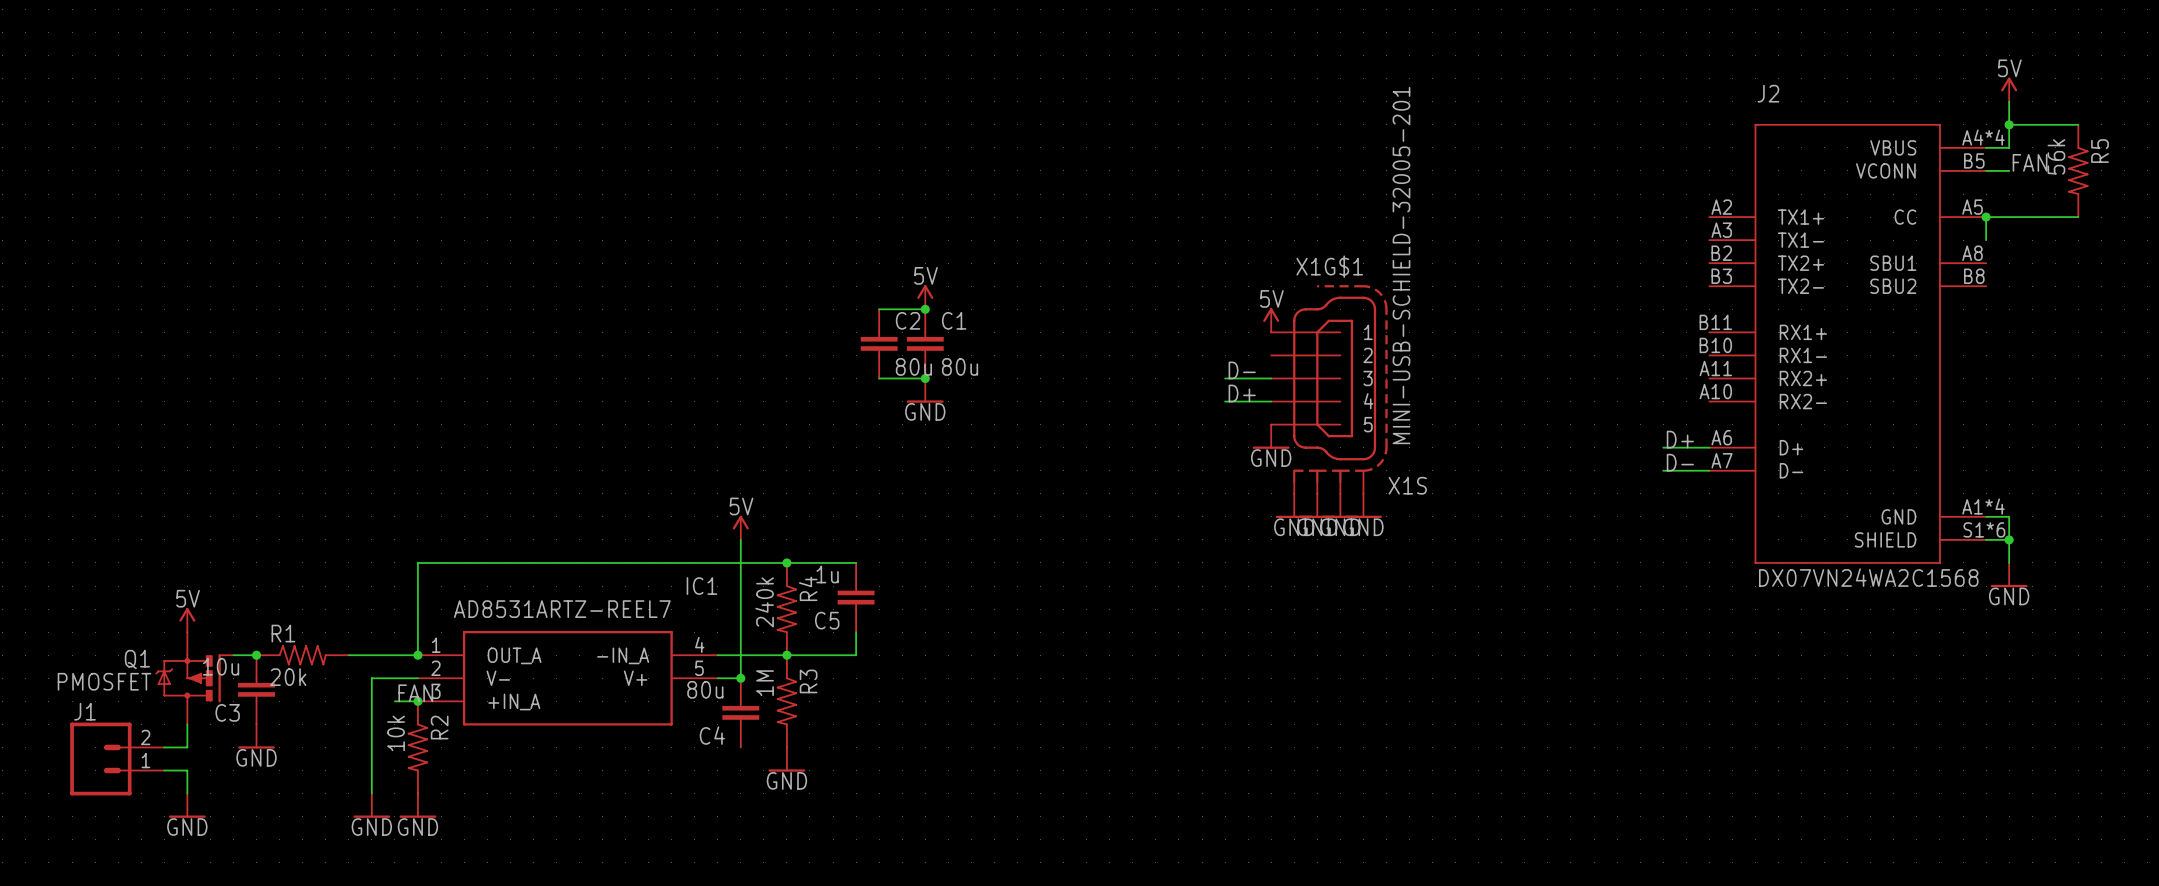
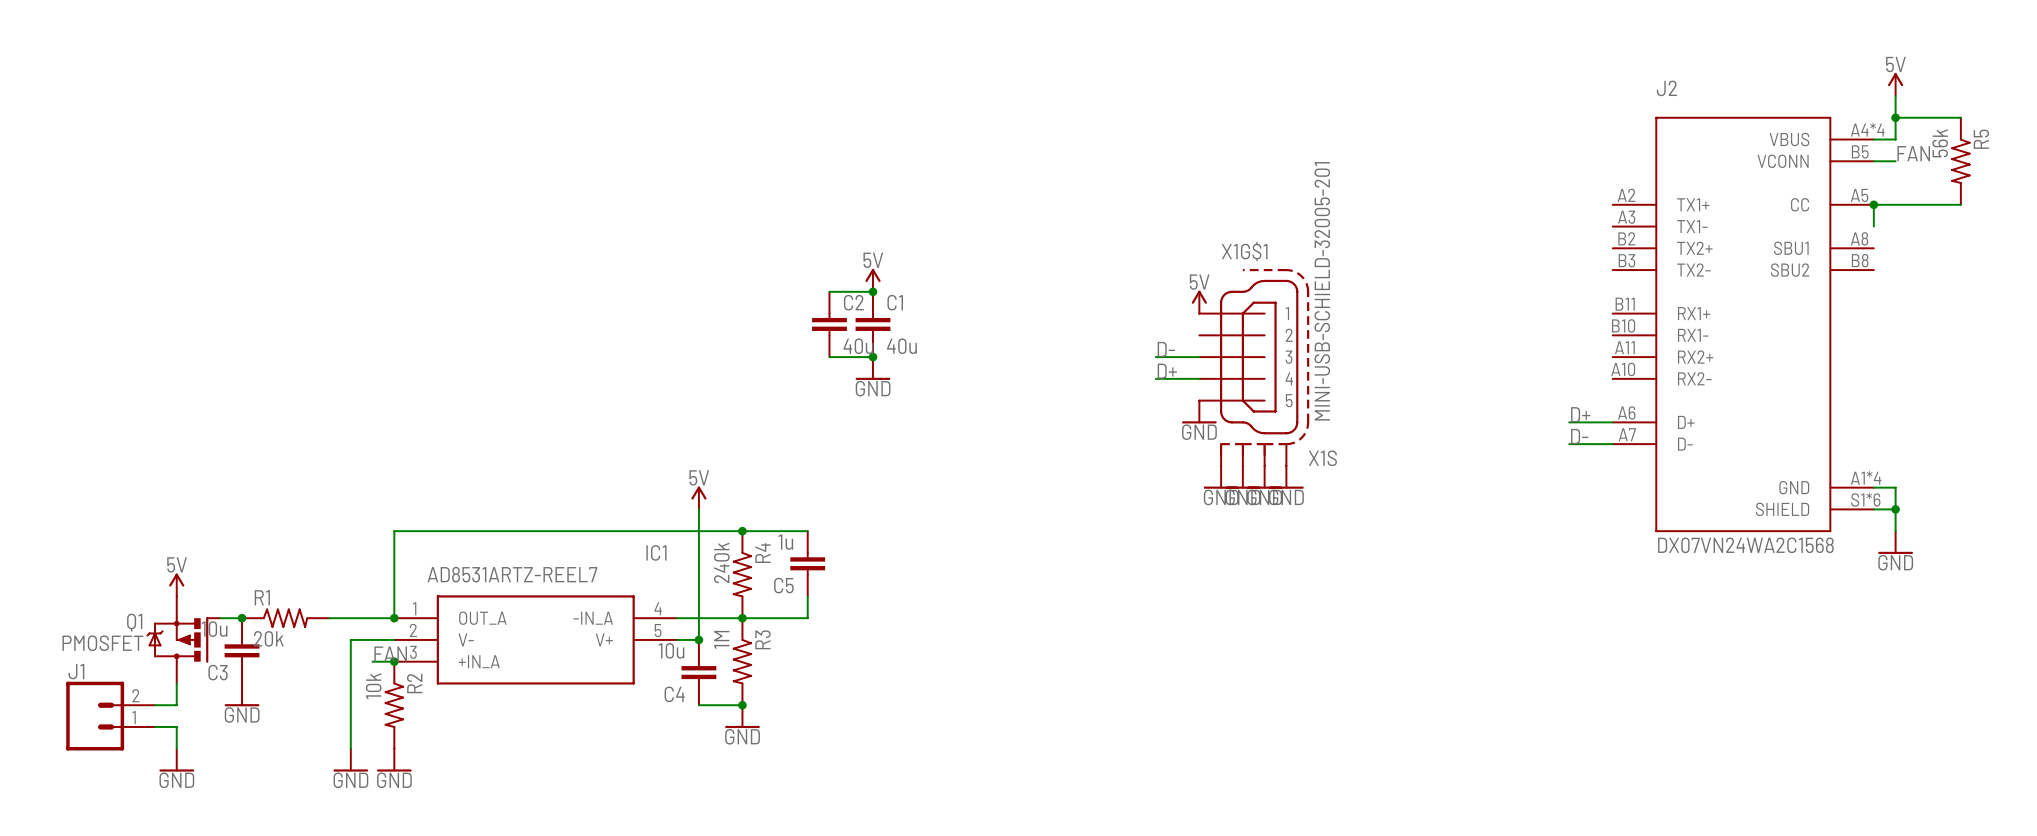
C2 value: 80u (913, 366) -> 40u (858, 346)
C1 value: 80u (960, 366) -> 40u (901, 346)
C4 value: 80u (705, 689) -> 10u (671, 650)
wire: none -> (698, 705) (742, 705)
junction: none -> (742, 705)

